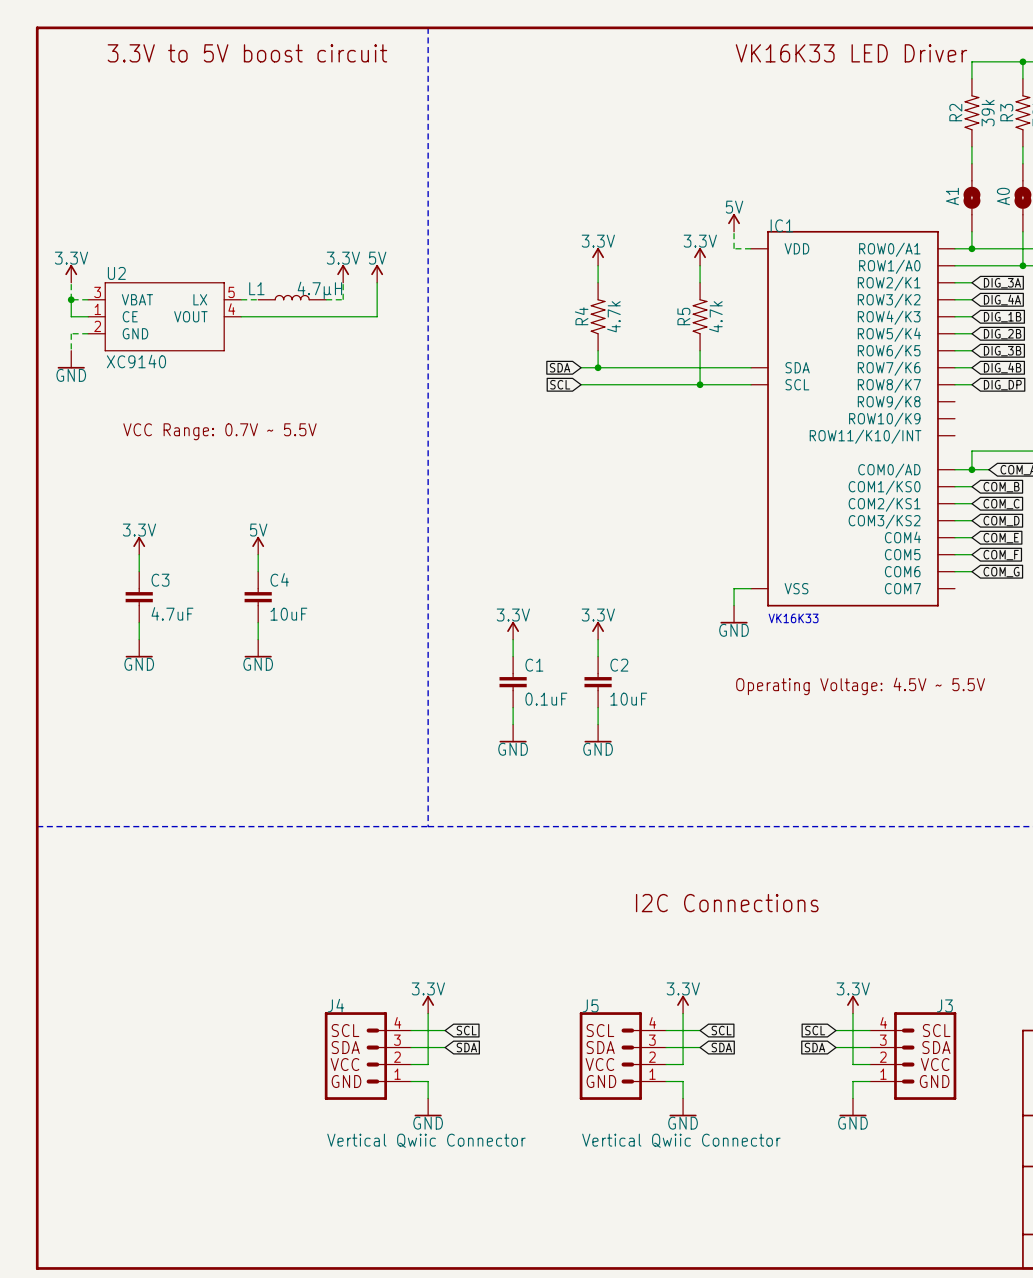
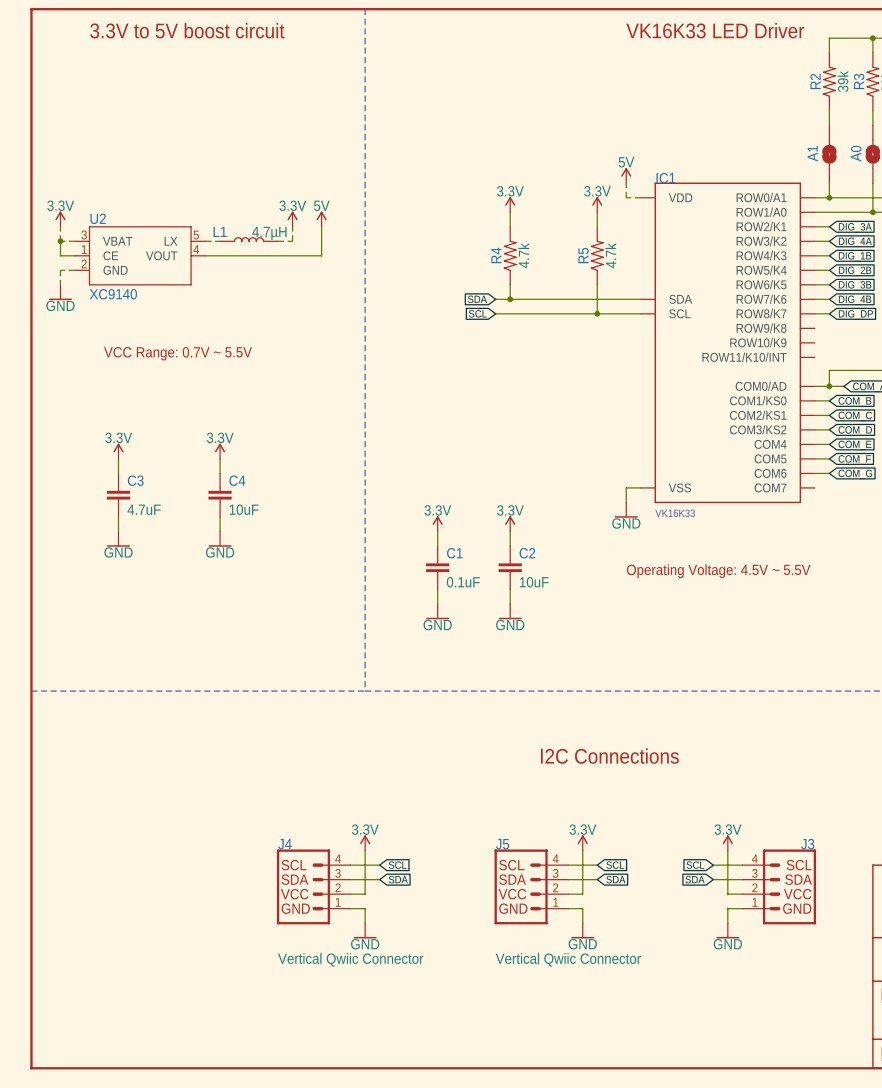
power symbol: 5V (258, 545) -> 3.3V (220, 451)

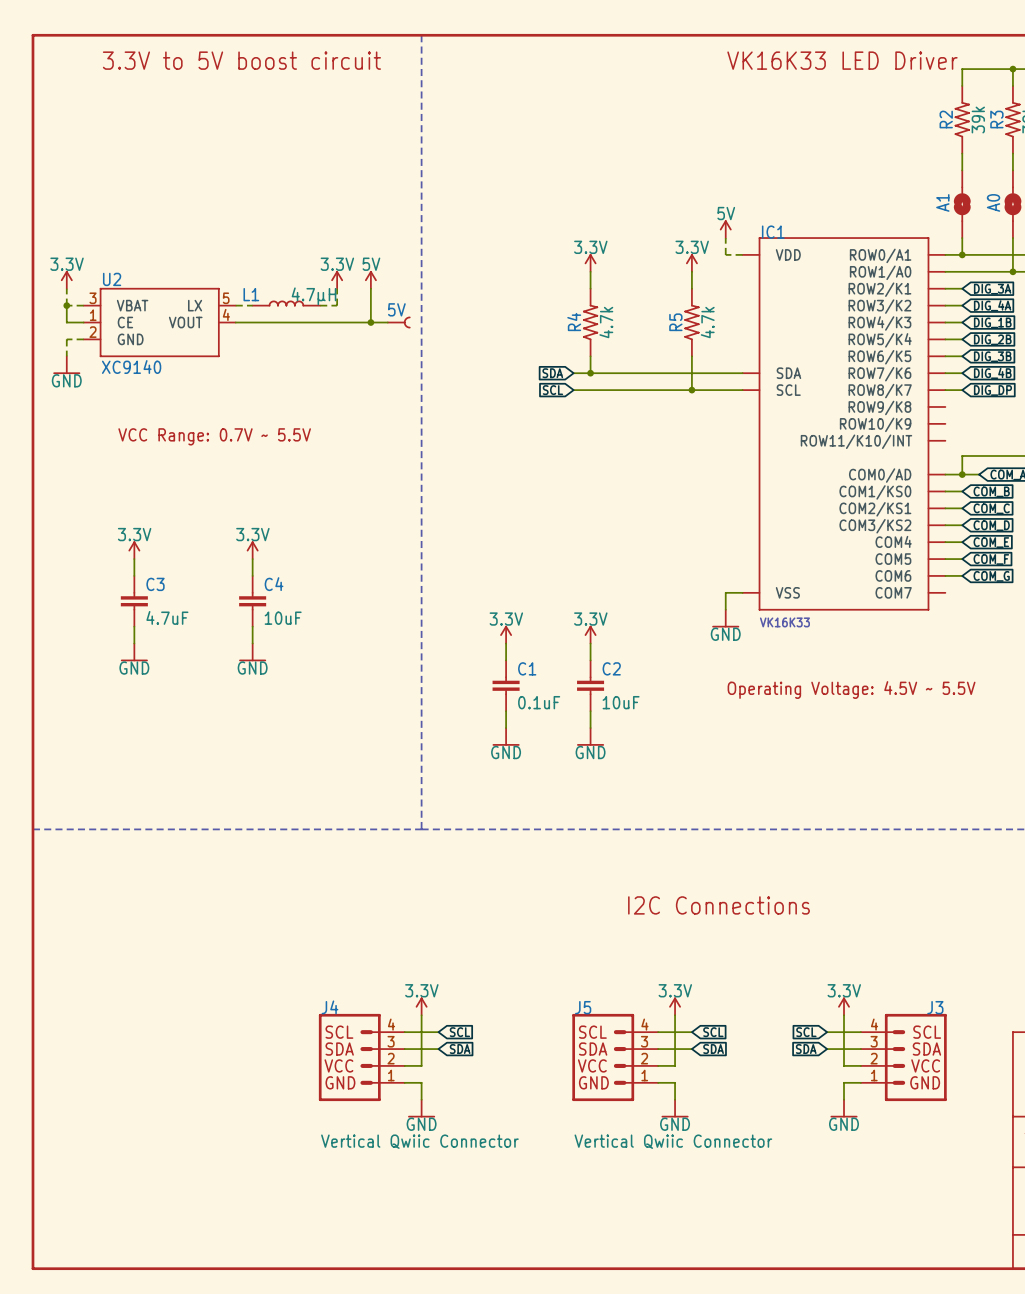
wire: none -> (370, 322) (387, 322)
junction: none -> (370, 322)
5V: none -> (398, 322)

